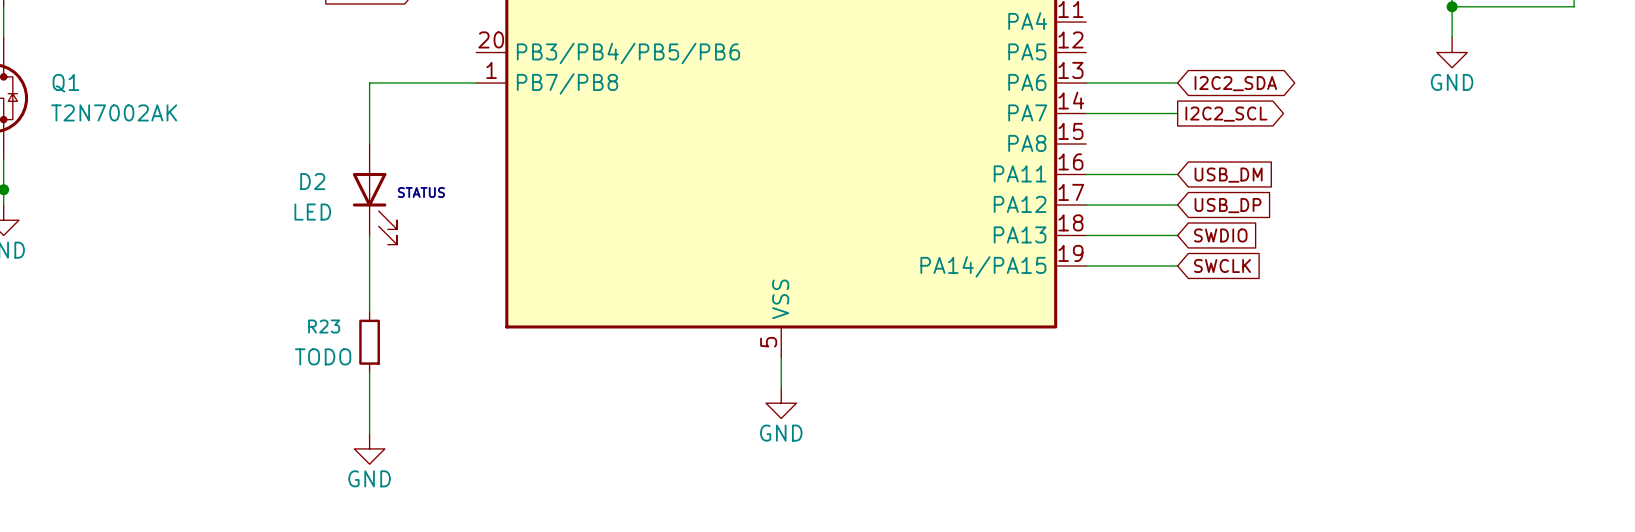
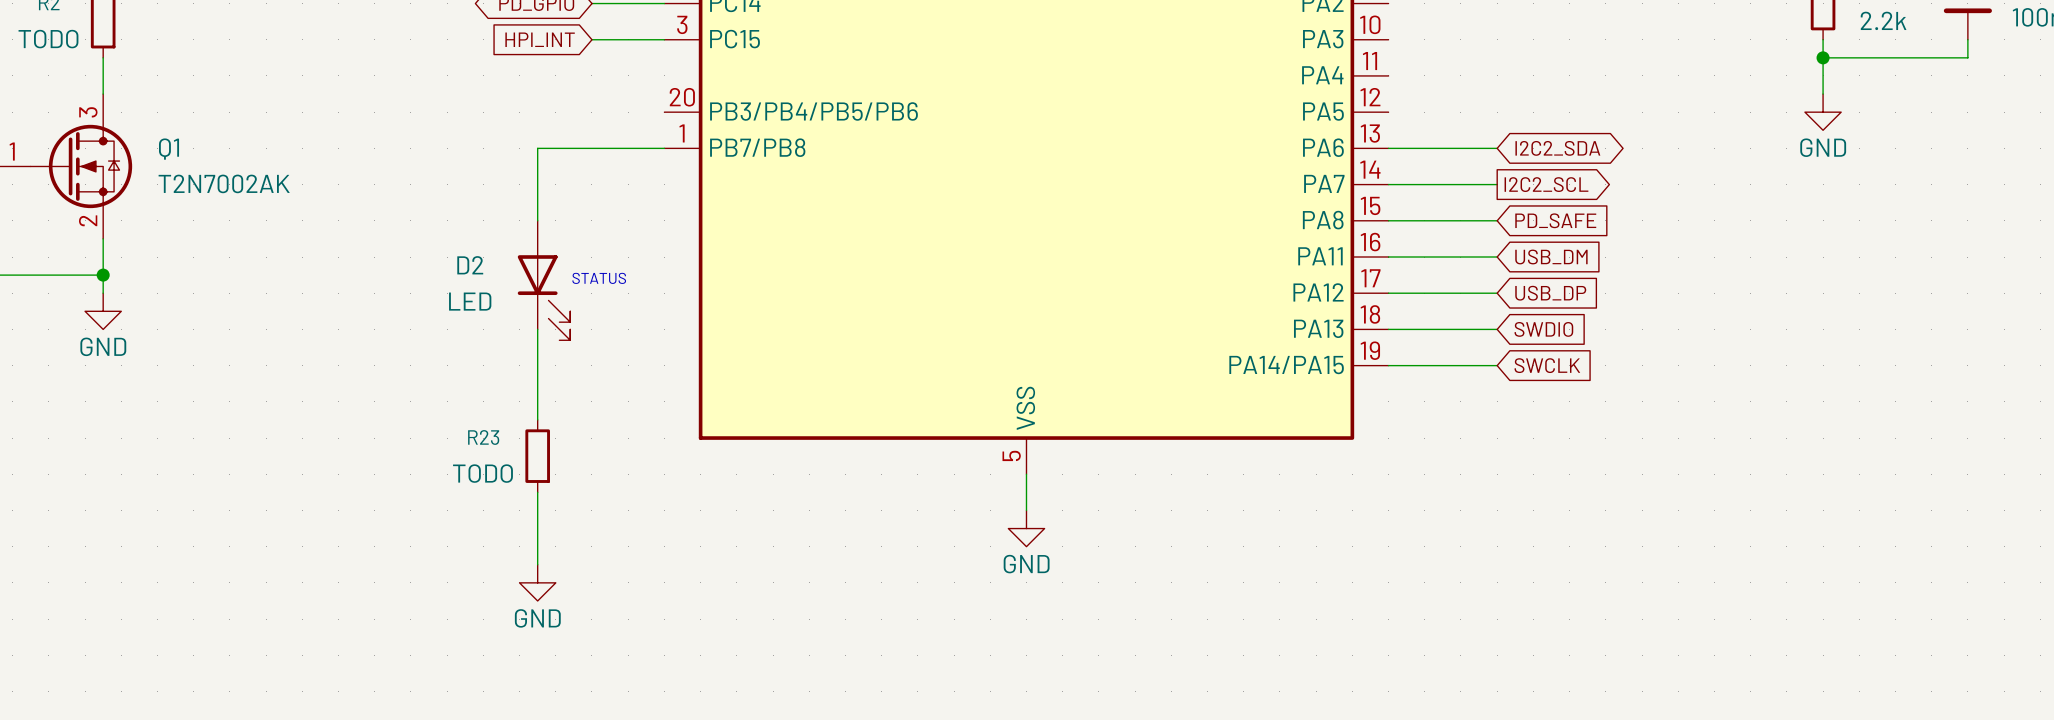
wire: none -> (1388, 220) (1497, 220)
global label: none -> PD_SAFE (1555, 220)

